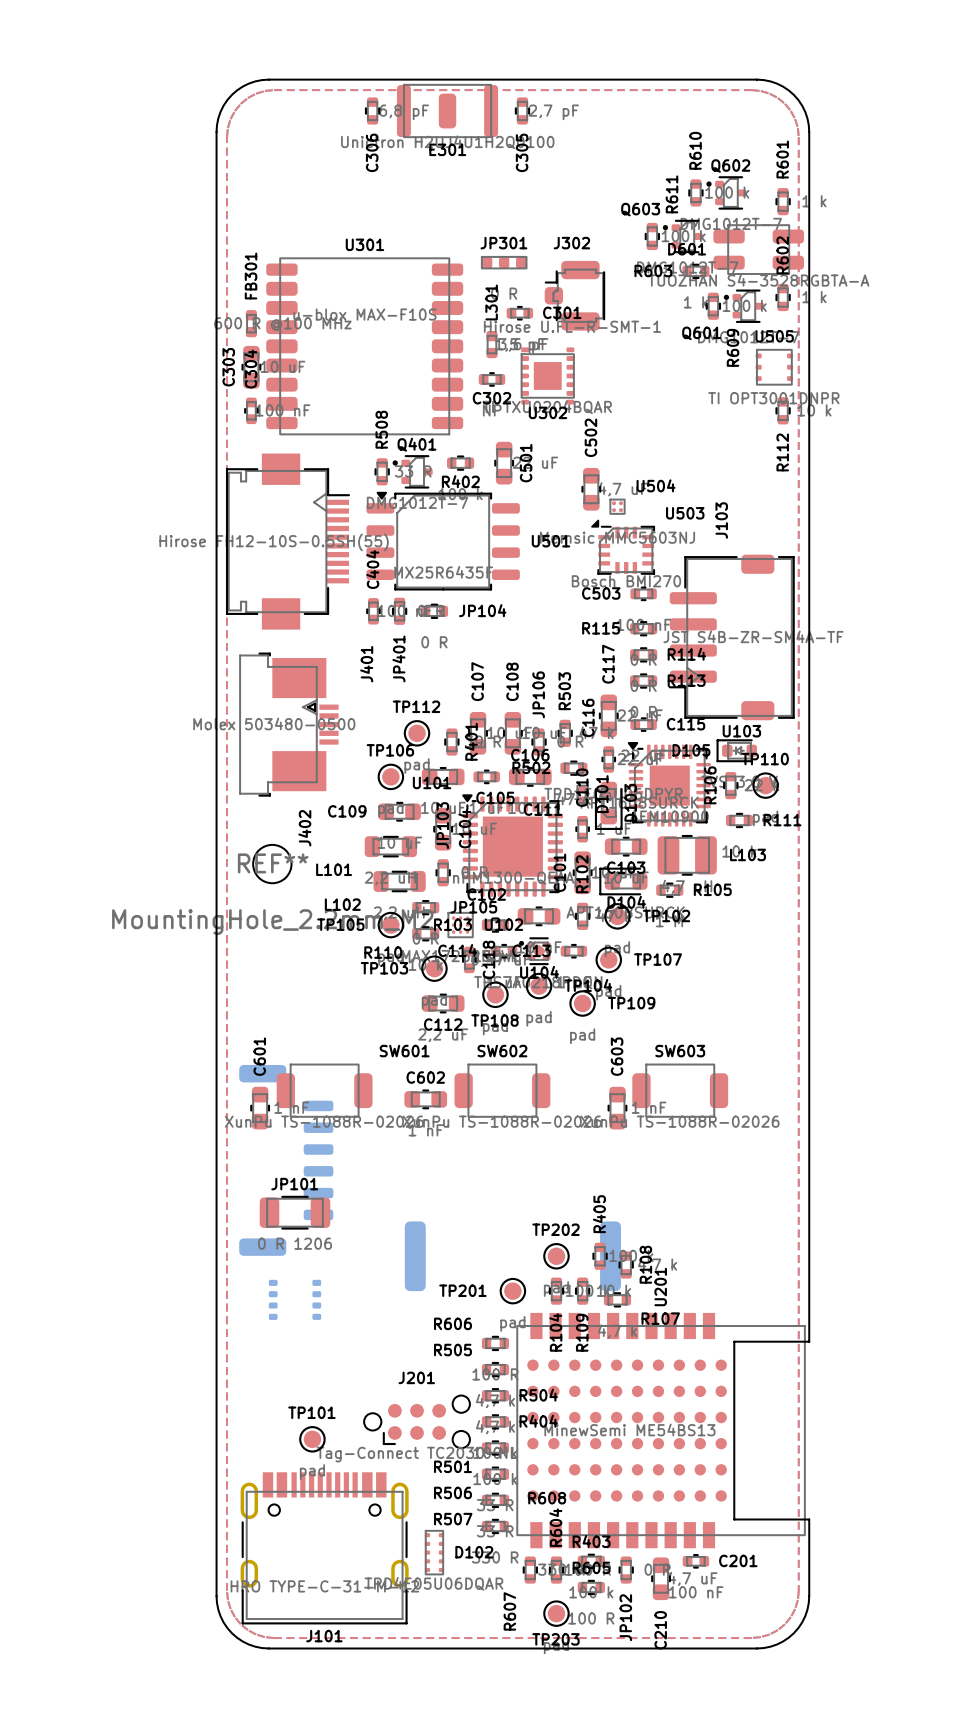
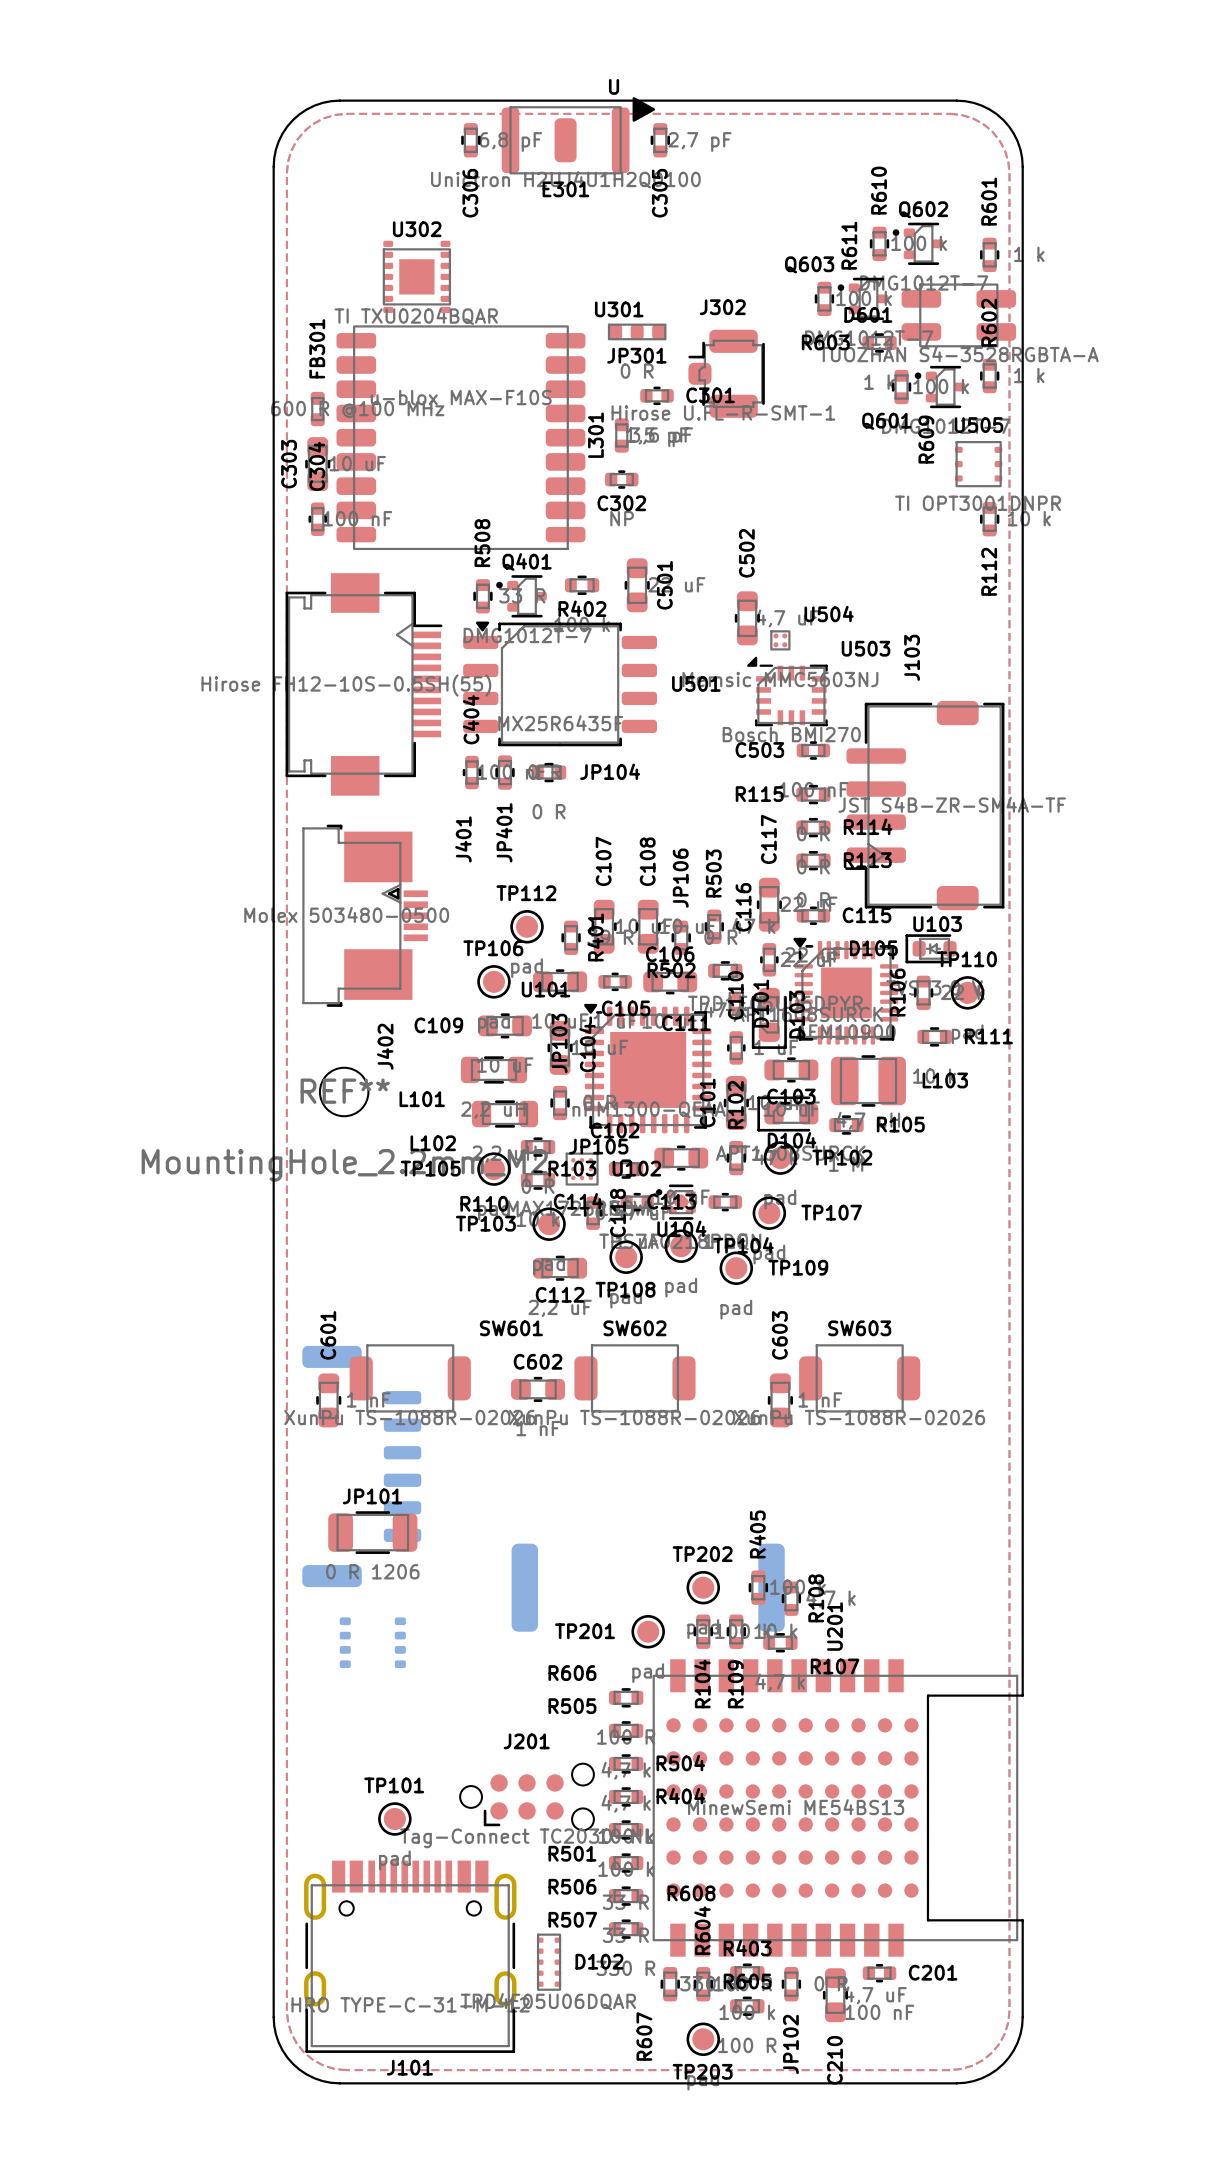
E301 footprint: [396, 83, 499, 139] -> [501, 97, 656, 175]
JP301 name position: JP301 (503, 243) -> JP301 (636, 355)
U301 name position: U301 (364, 244) -> U301 (619, 309)
L301 name position: L301 (491, 302) -> L301 (595, 435)
U302 position: (547, 375) -> (416, 276)
U302 name position: U302 (548, 412) -> U302 (417, 229)

